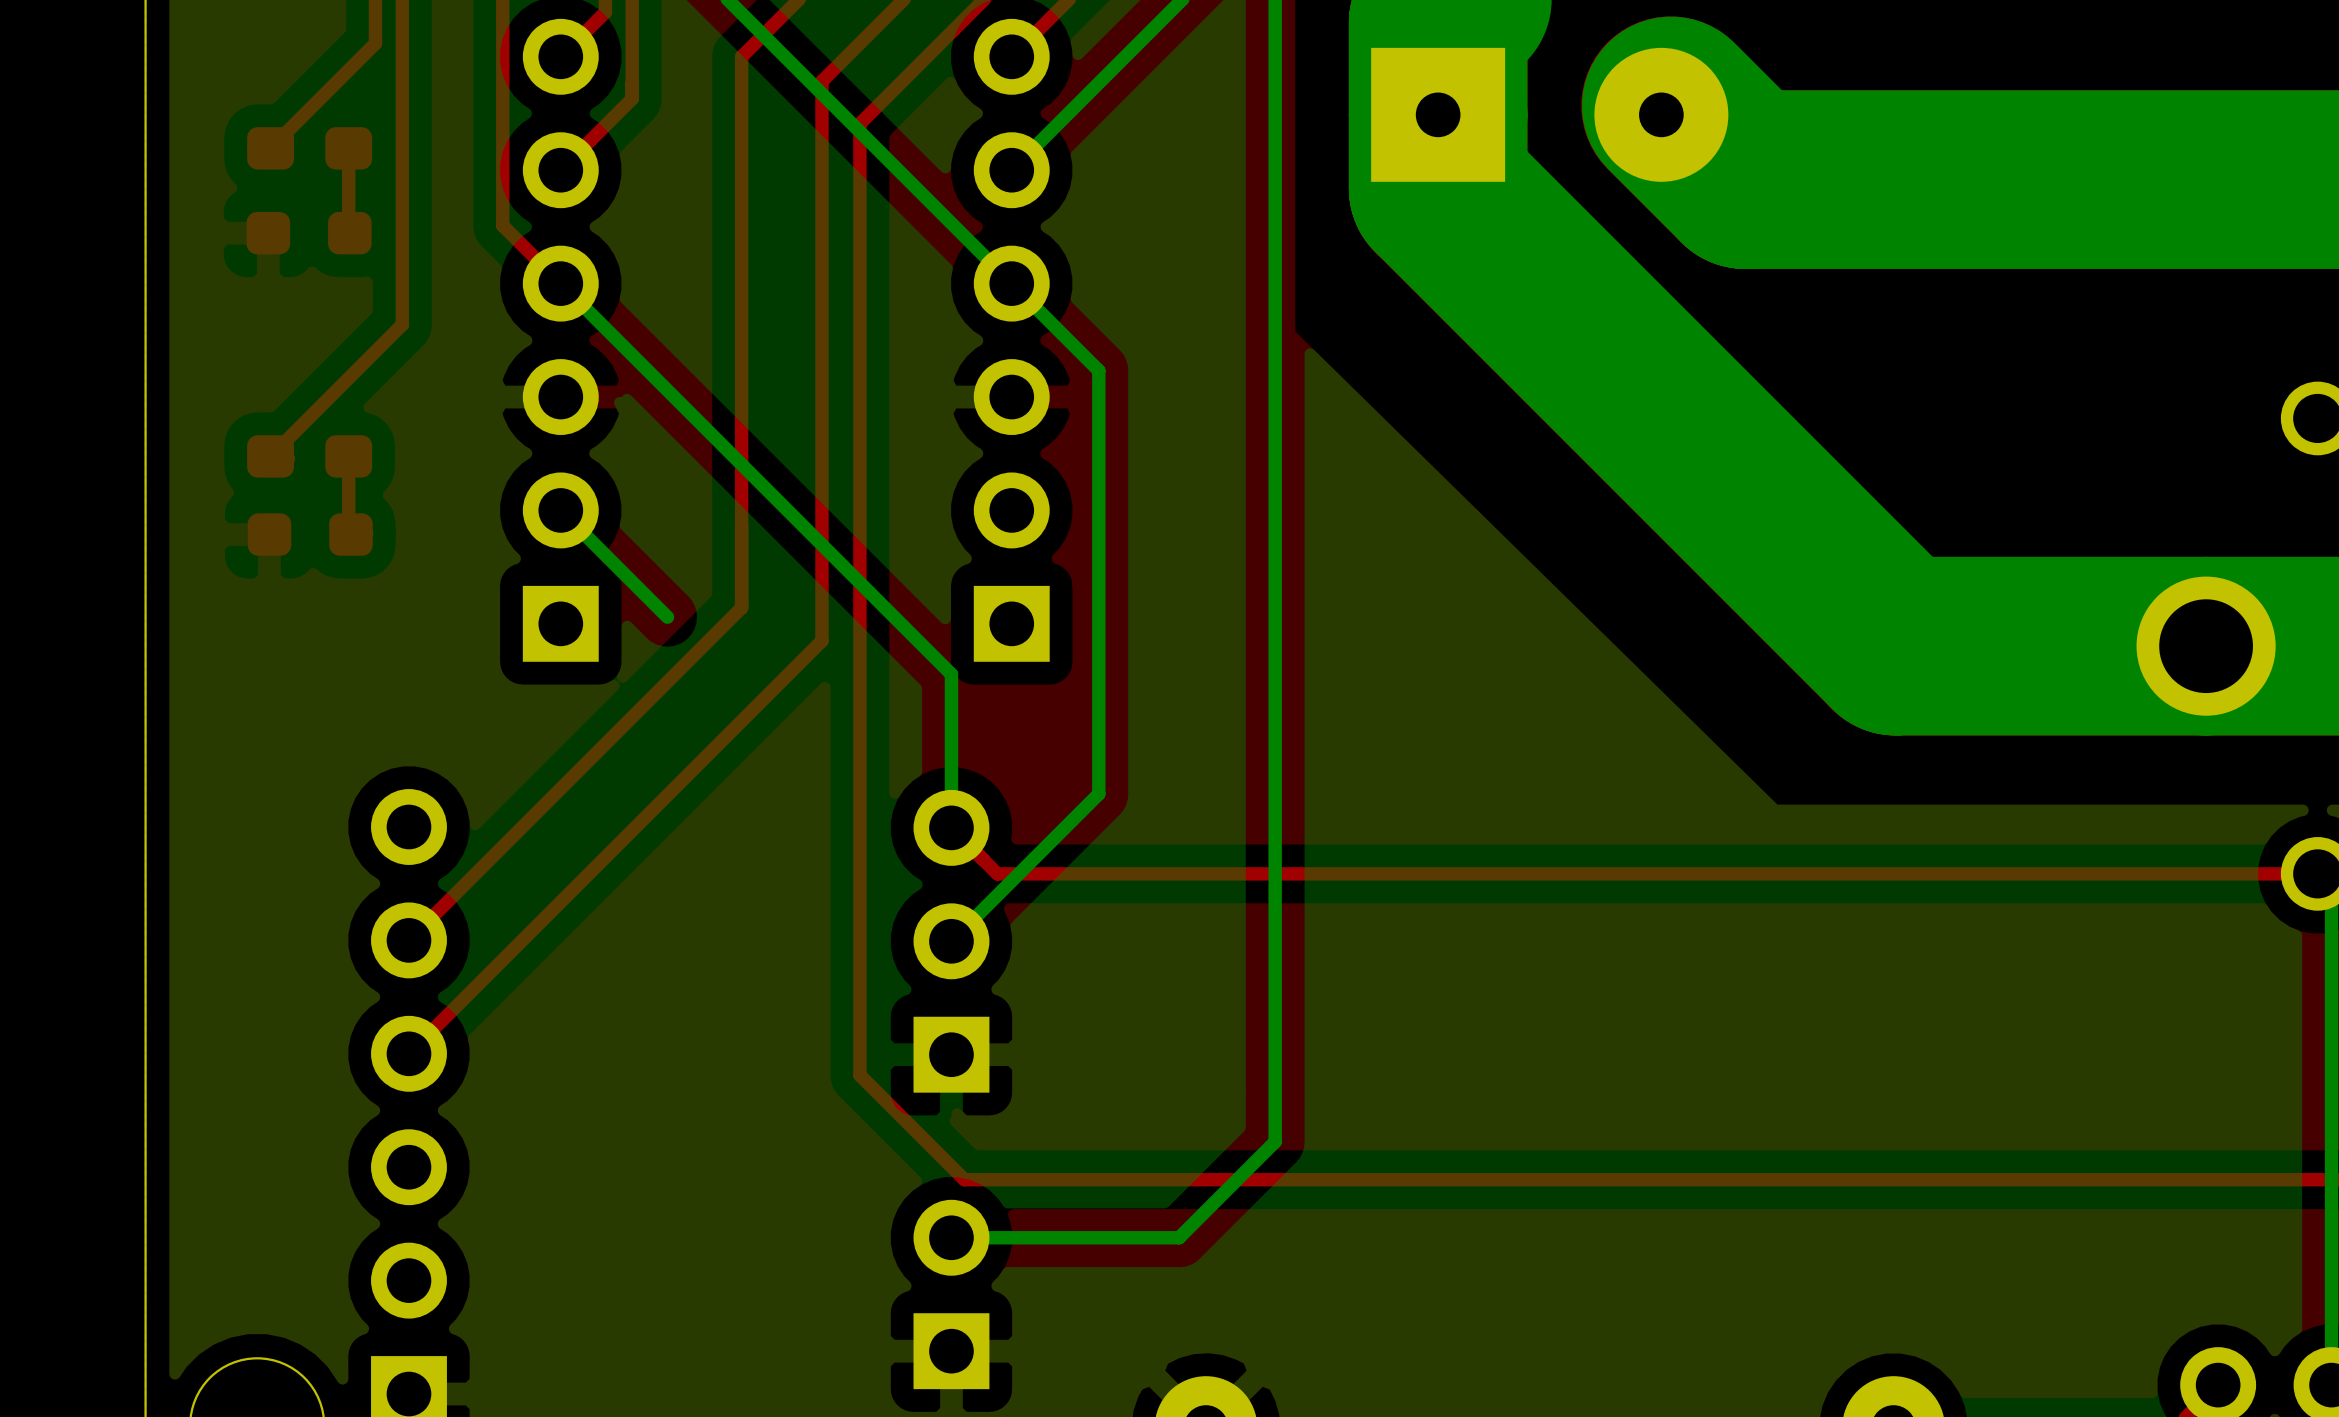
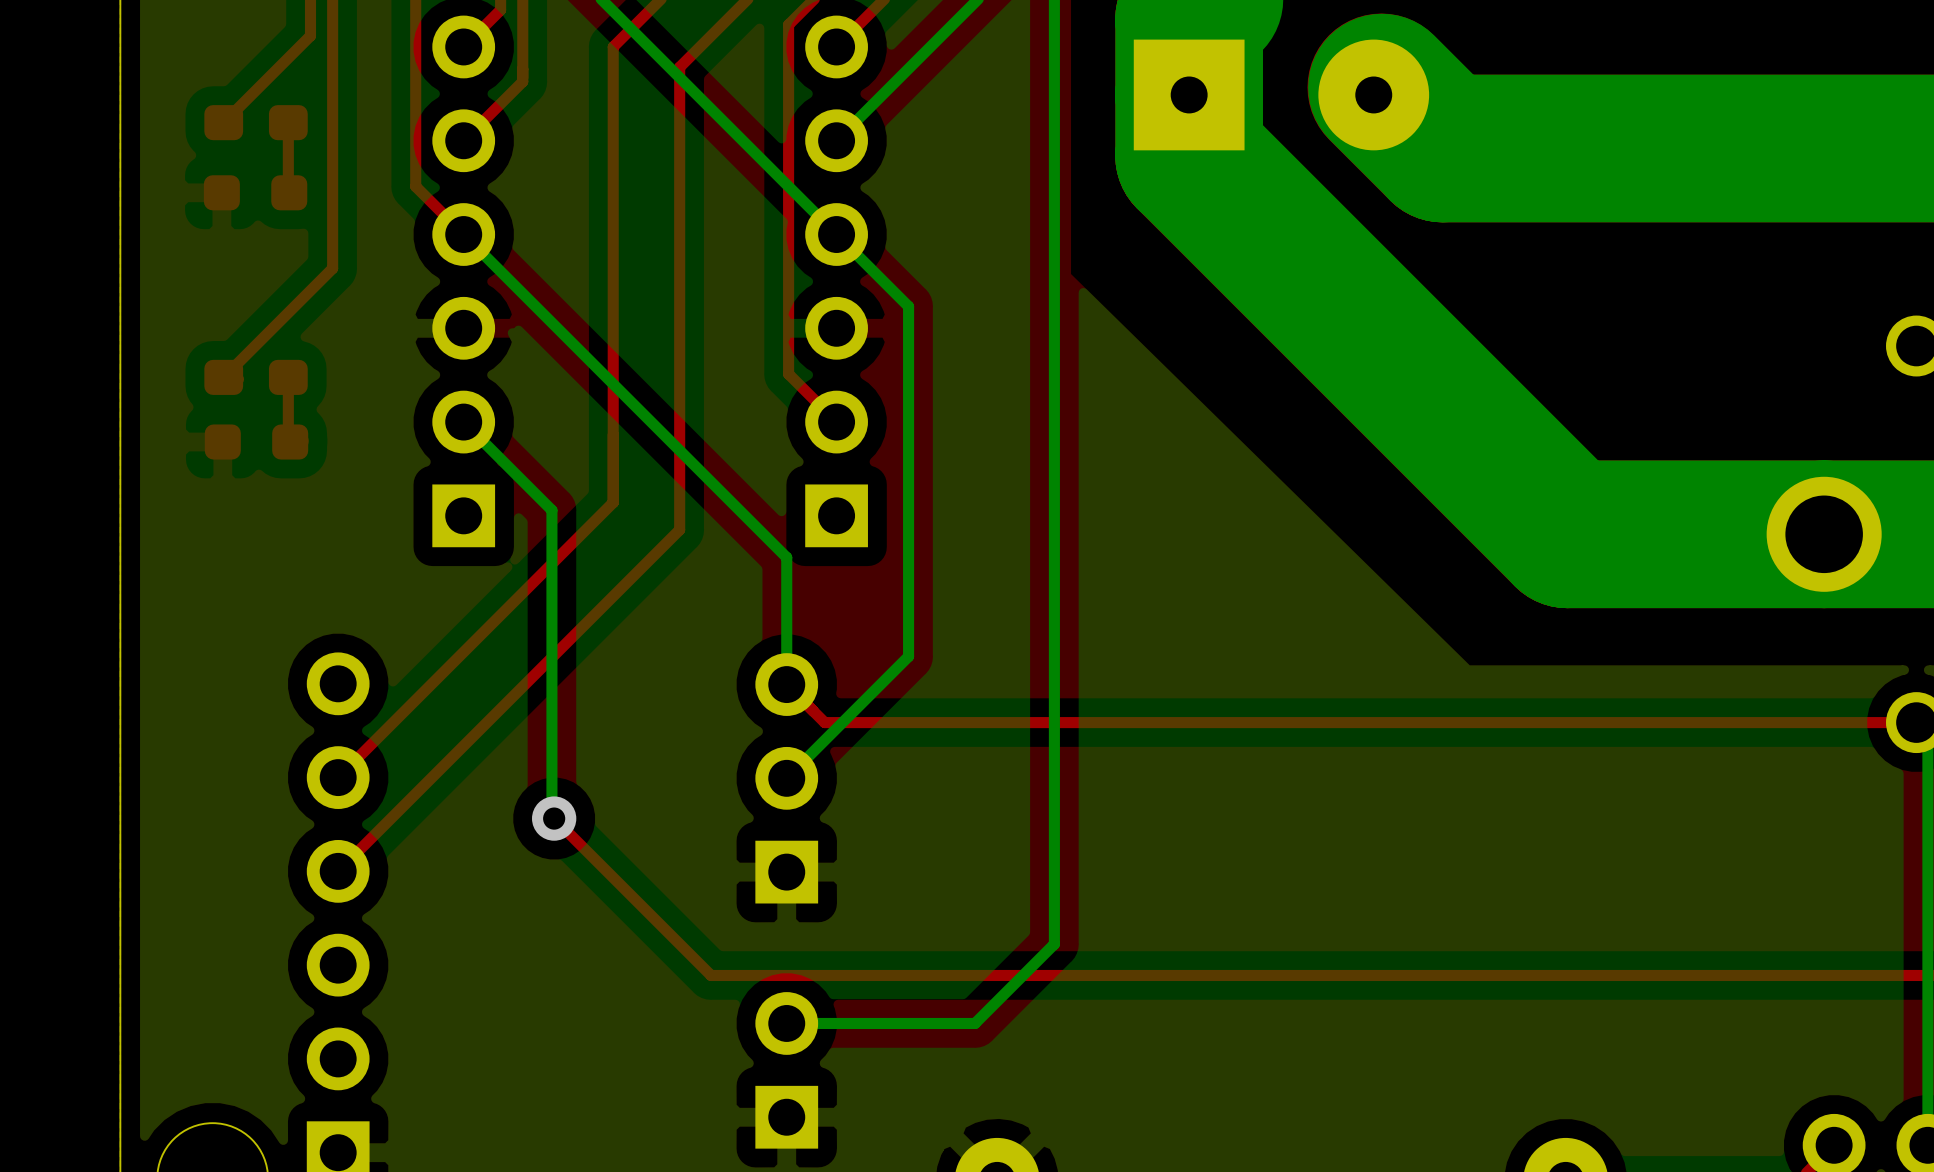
top track: (953, 30) (859, 123) (859, 1075) (964, 1179) -> (788, 24) (788, 374) (836, 422)
bottom track: none -> (551, 510) (551, 816) (554, 818)
top track: none -> (554, 818) (711, 975) (797, 975)
via: none -> (554, 818)

